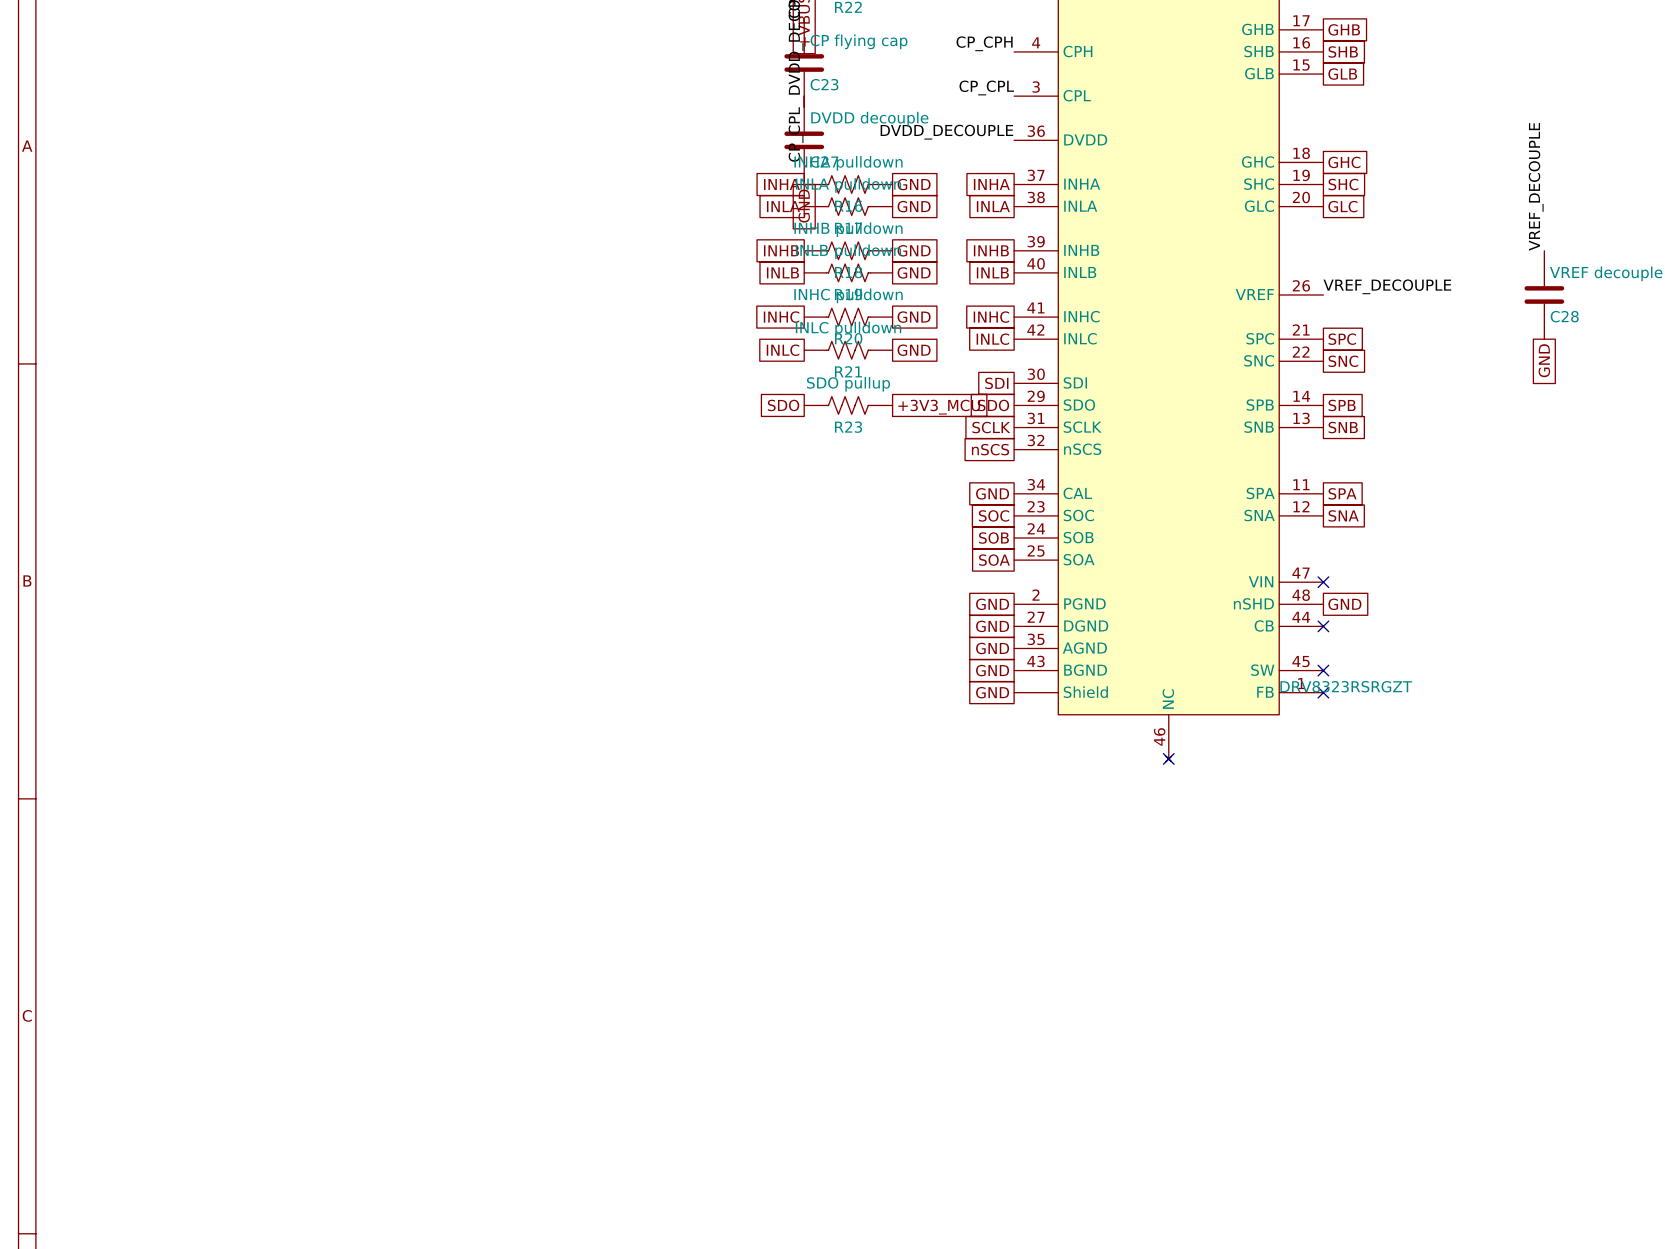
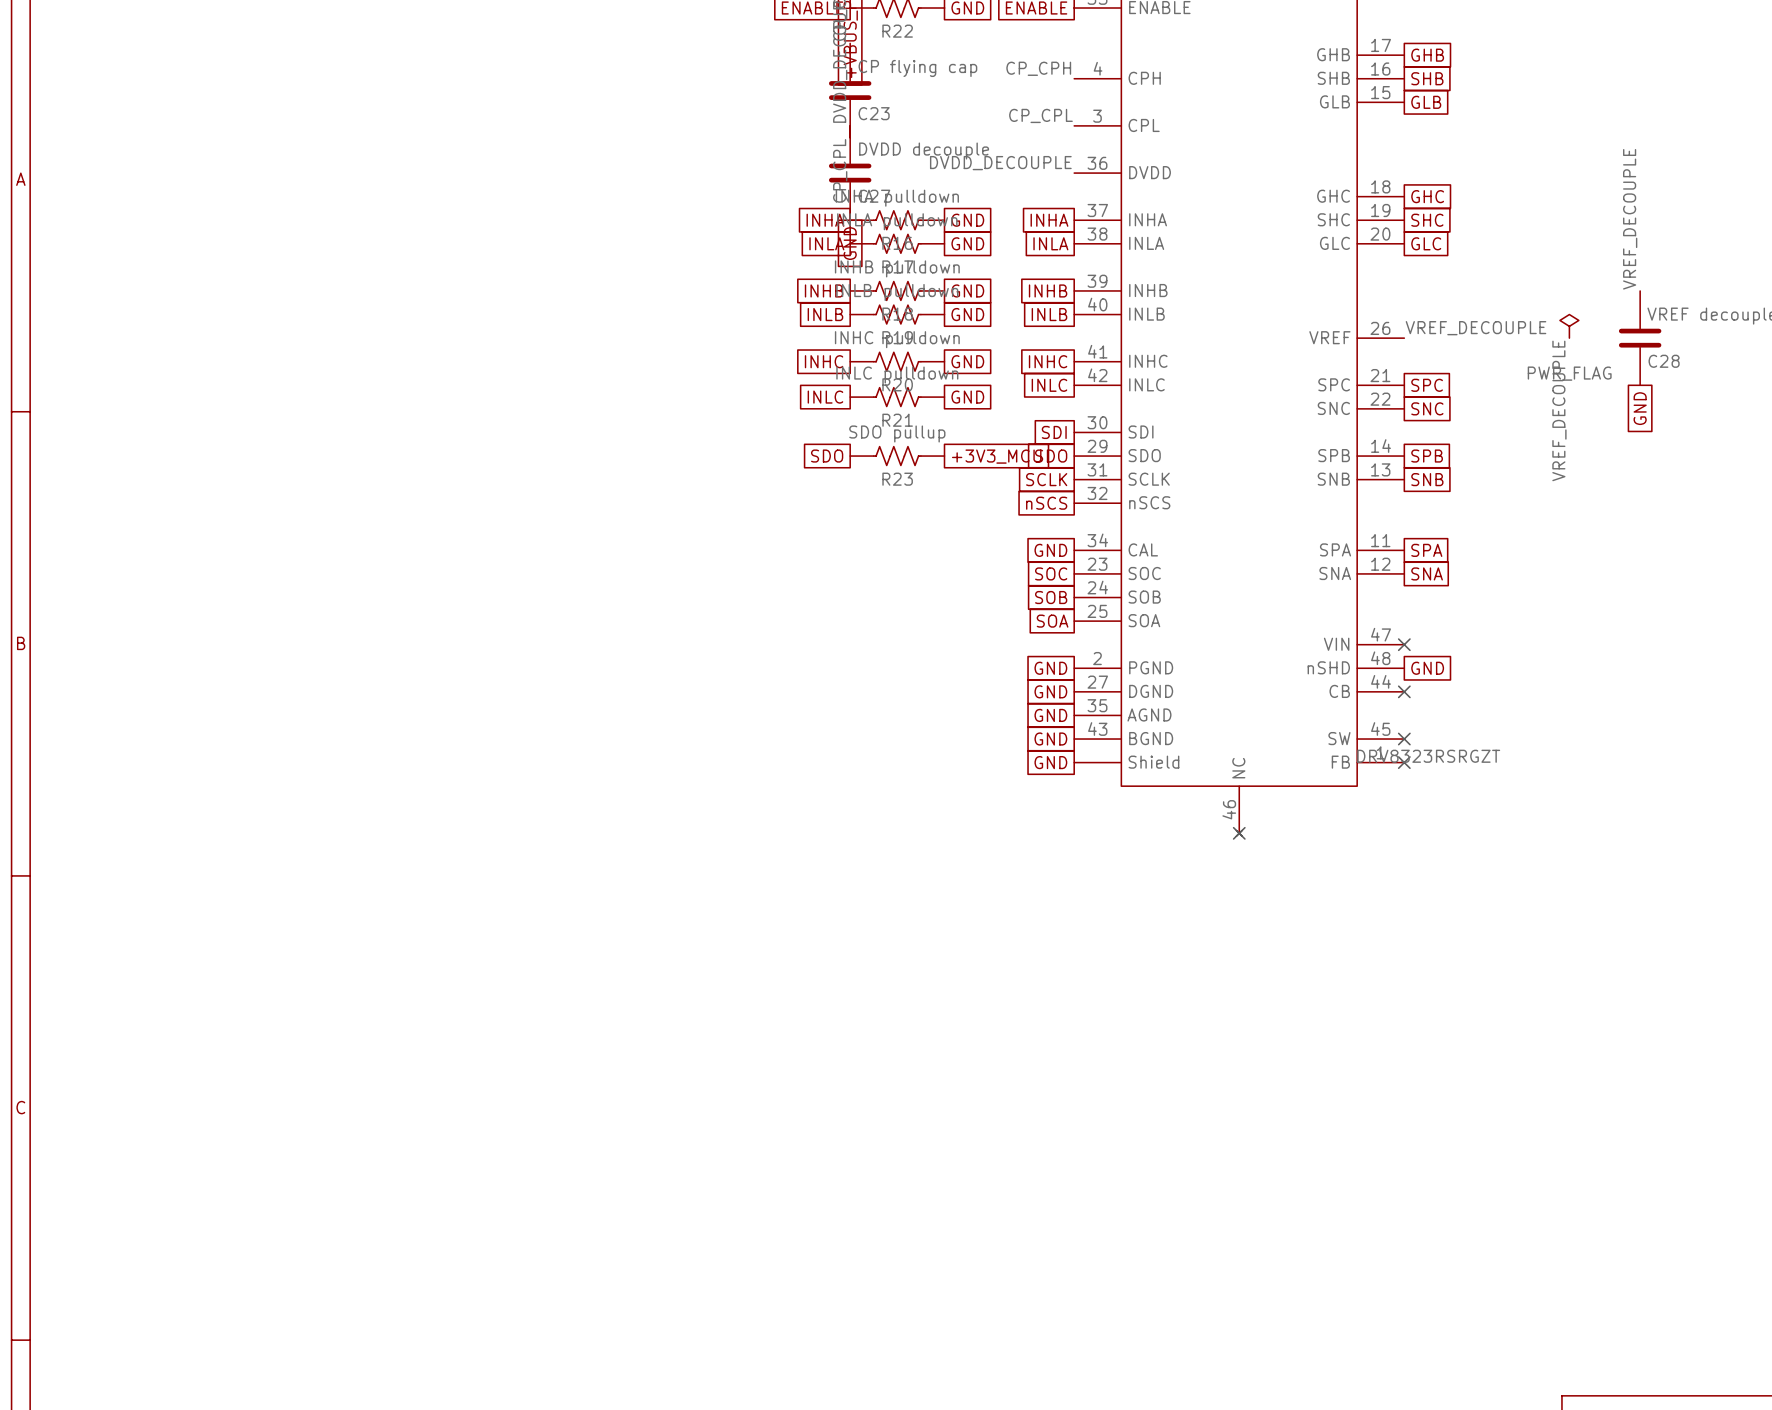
power symbol: none -> PWR_FLAG (1569, 326)
label: none -> VREF_DECOUPLE (1559, 410)

